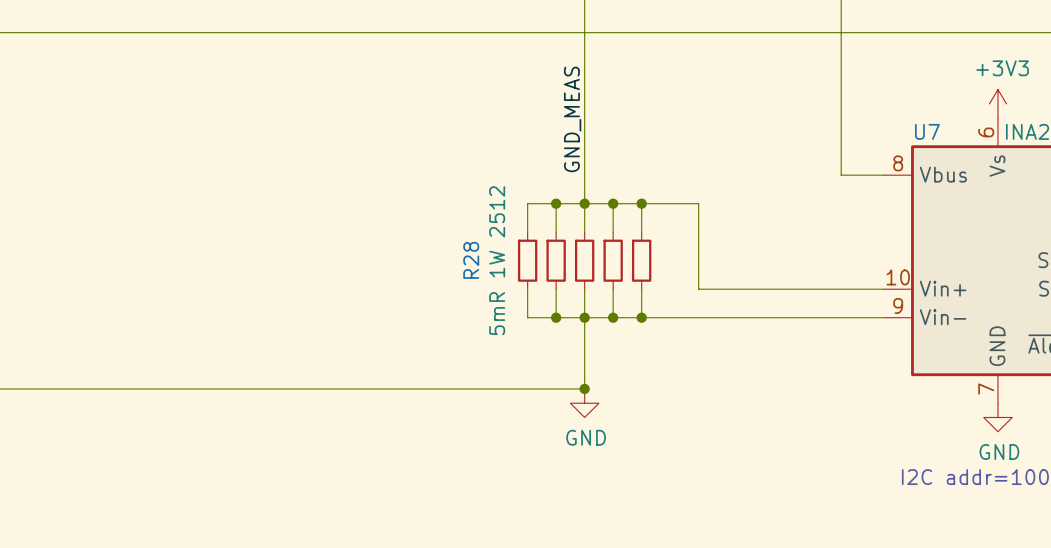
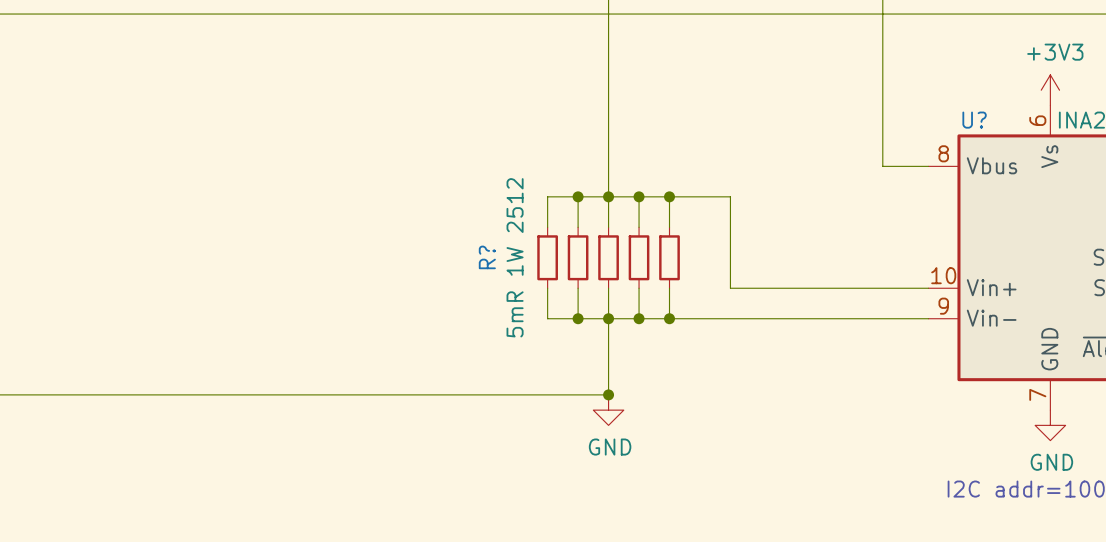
label: GND_MEAS (572, 119) -> none
U7 name: U7 (927, 131) -> U? (974, 120)
R28 name: R28 (471, 260) -> R? (487, 257)

